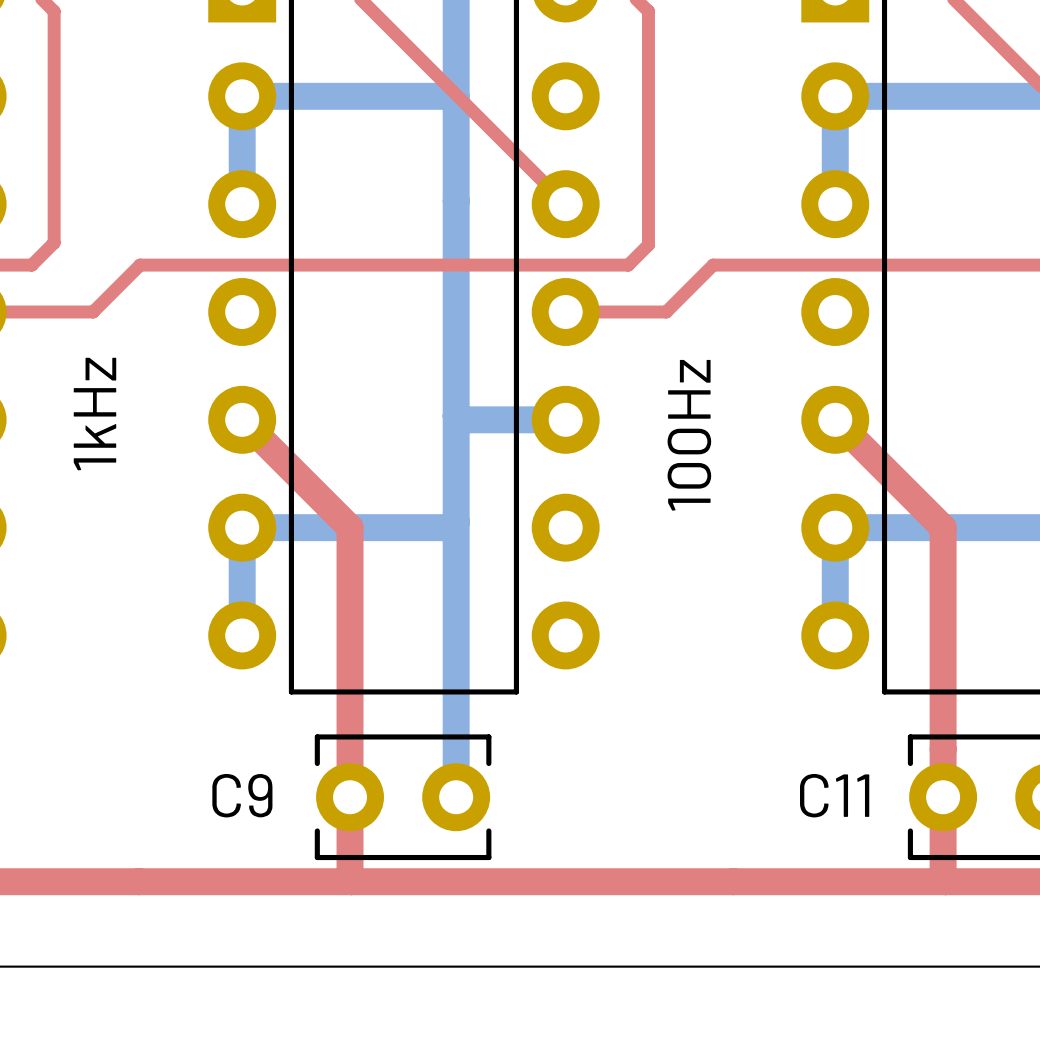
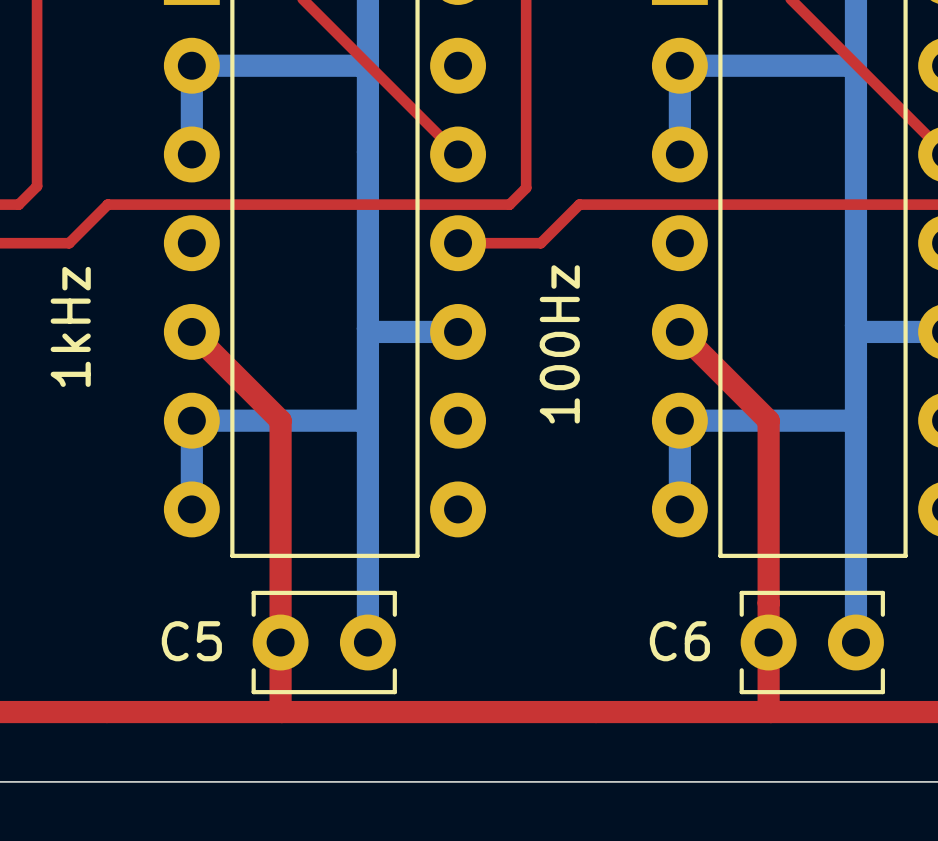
C9 name: C9 (242, 795) -> C5 (191, 641)
C11 name: C11 (834, 795) -> C6 (679, 641)

